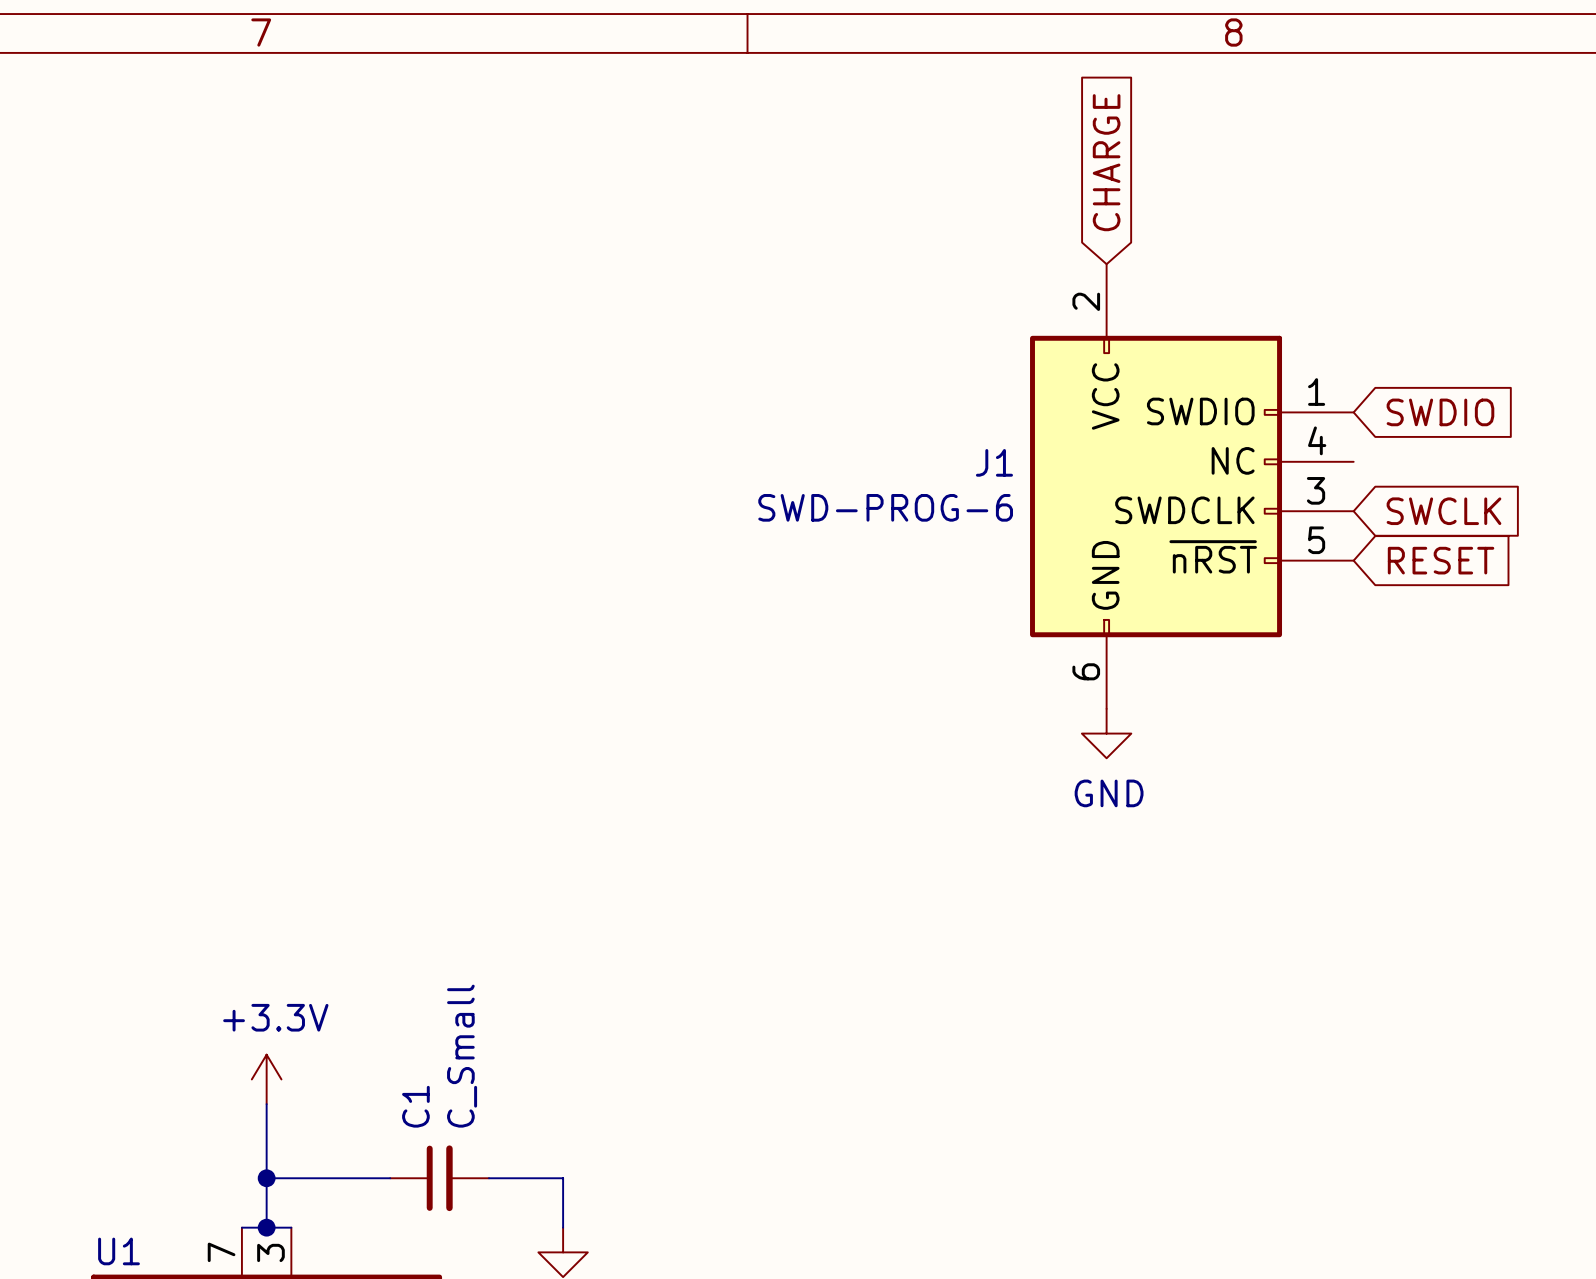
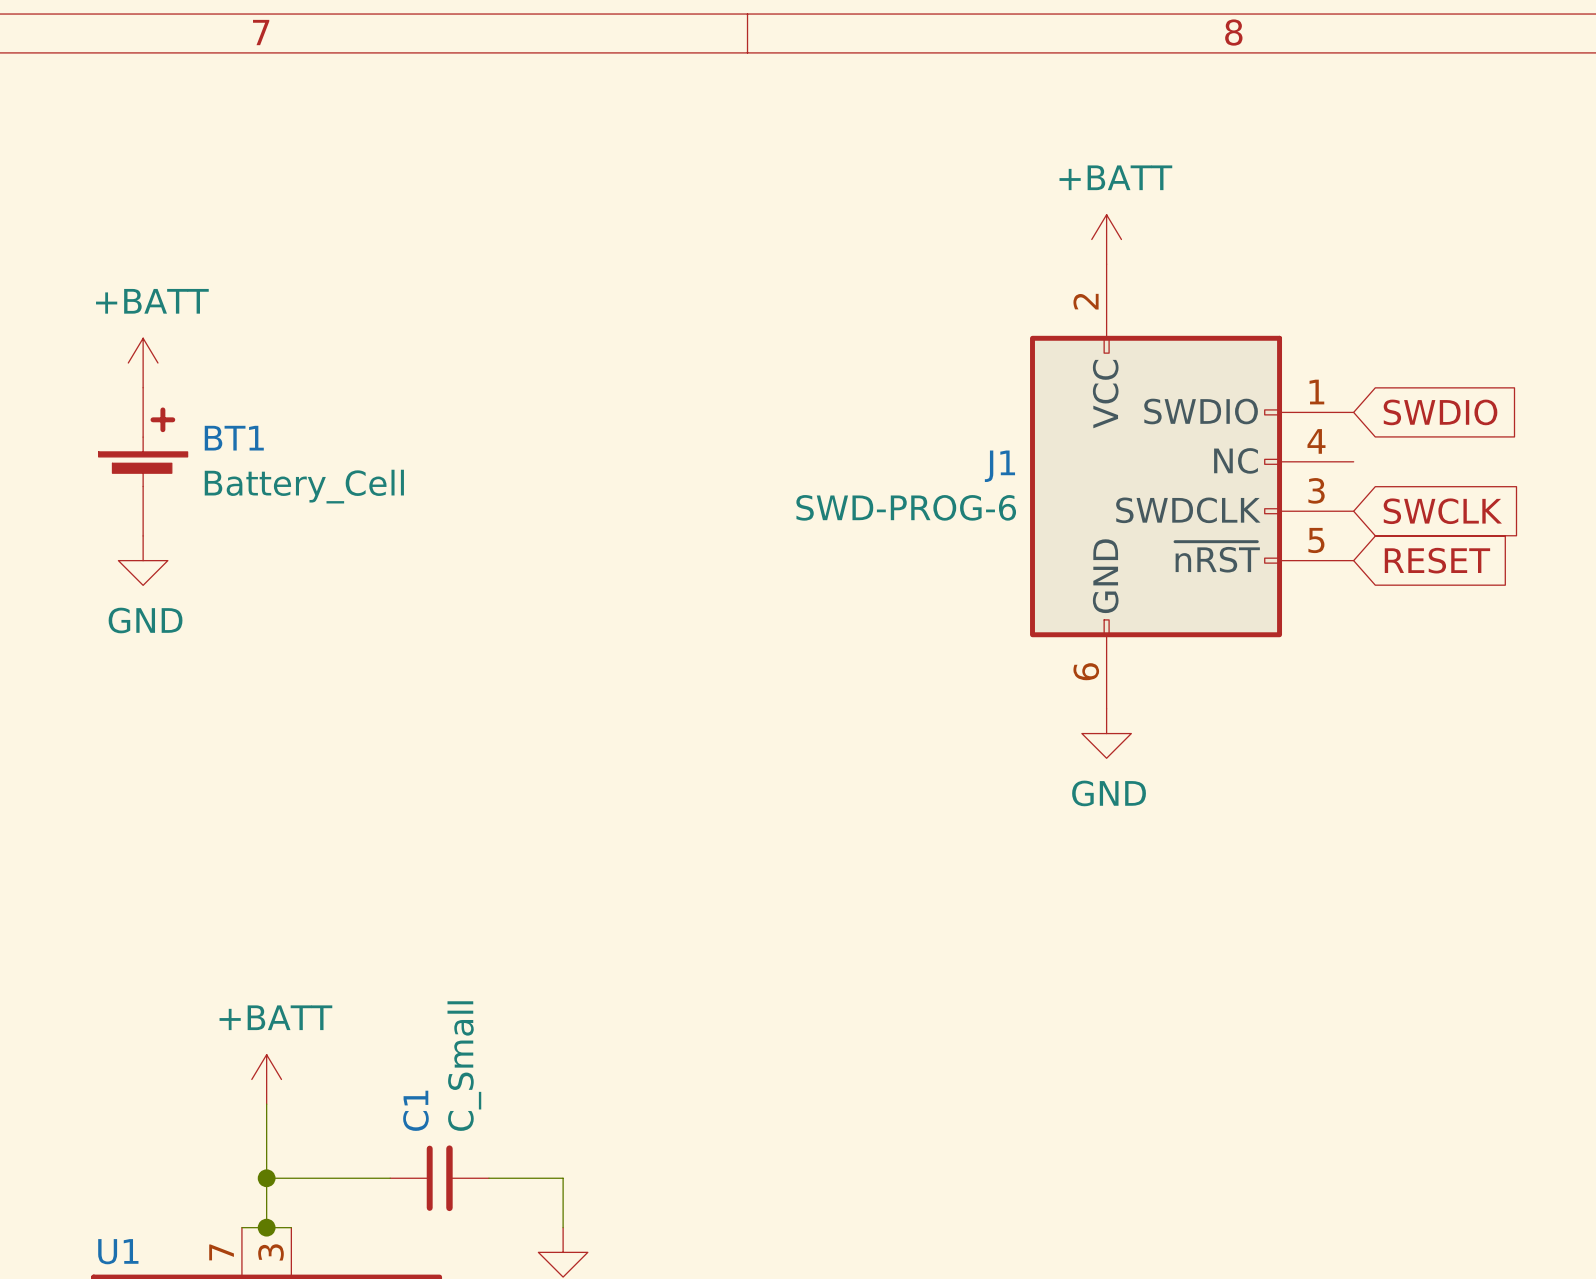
global label: CHARGE (1106, 162) -> none
power symbol: none -> +BATT (1106, 239)
power symbol: none -> +BATT (143, 363)
BT1: none -> Battery_Cell (143, 461)
power symbol: none -> GND (143, 560)
power symbol: +3.3V (266, 1079) -> +BATT (266, 1079)

